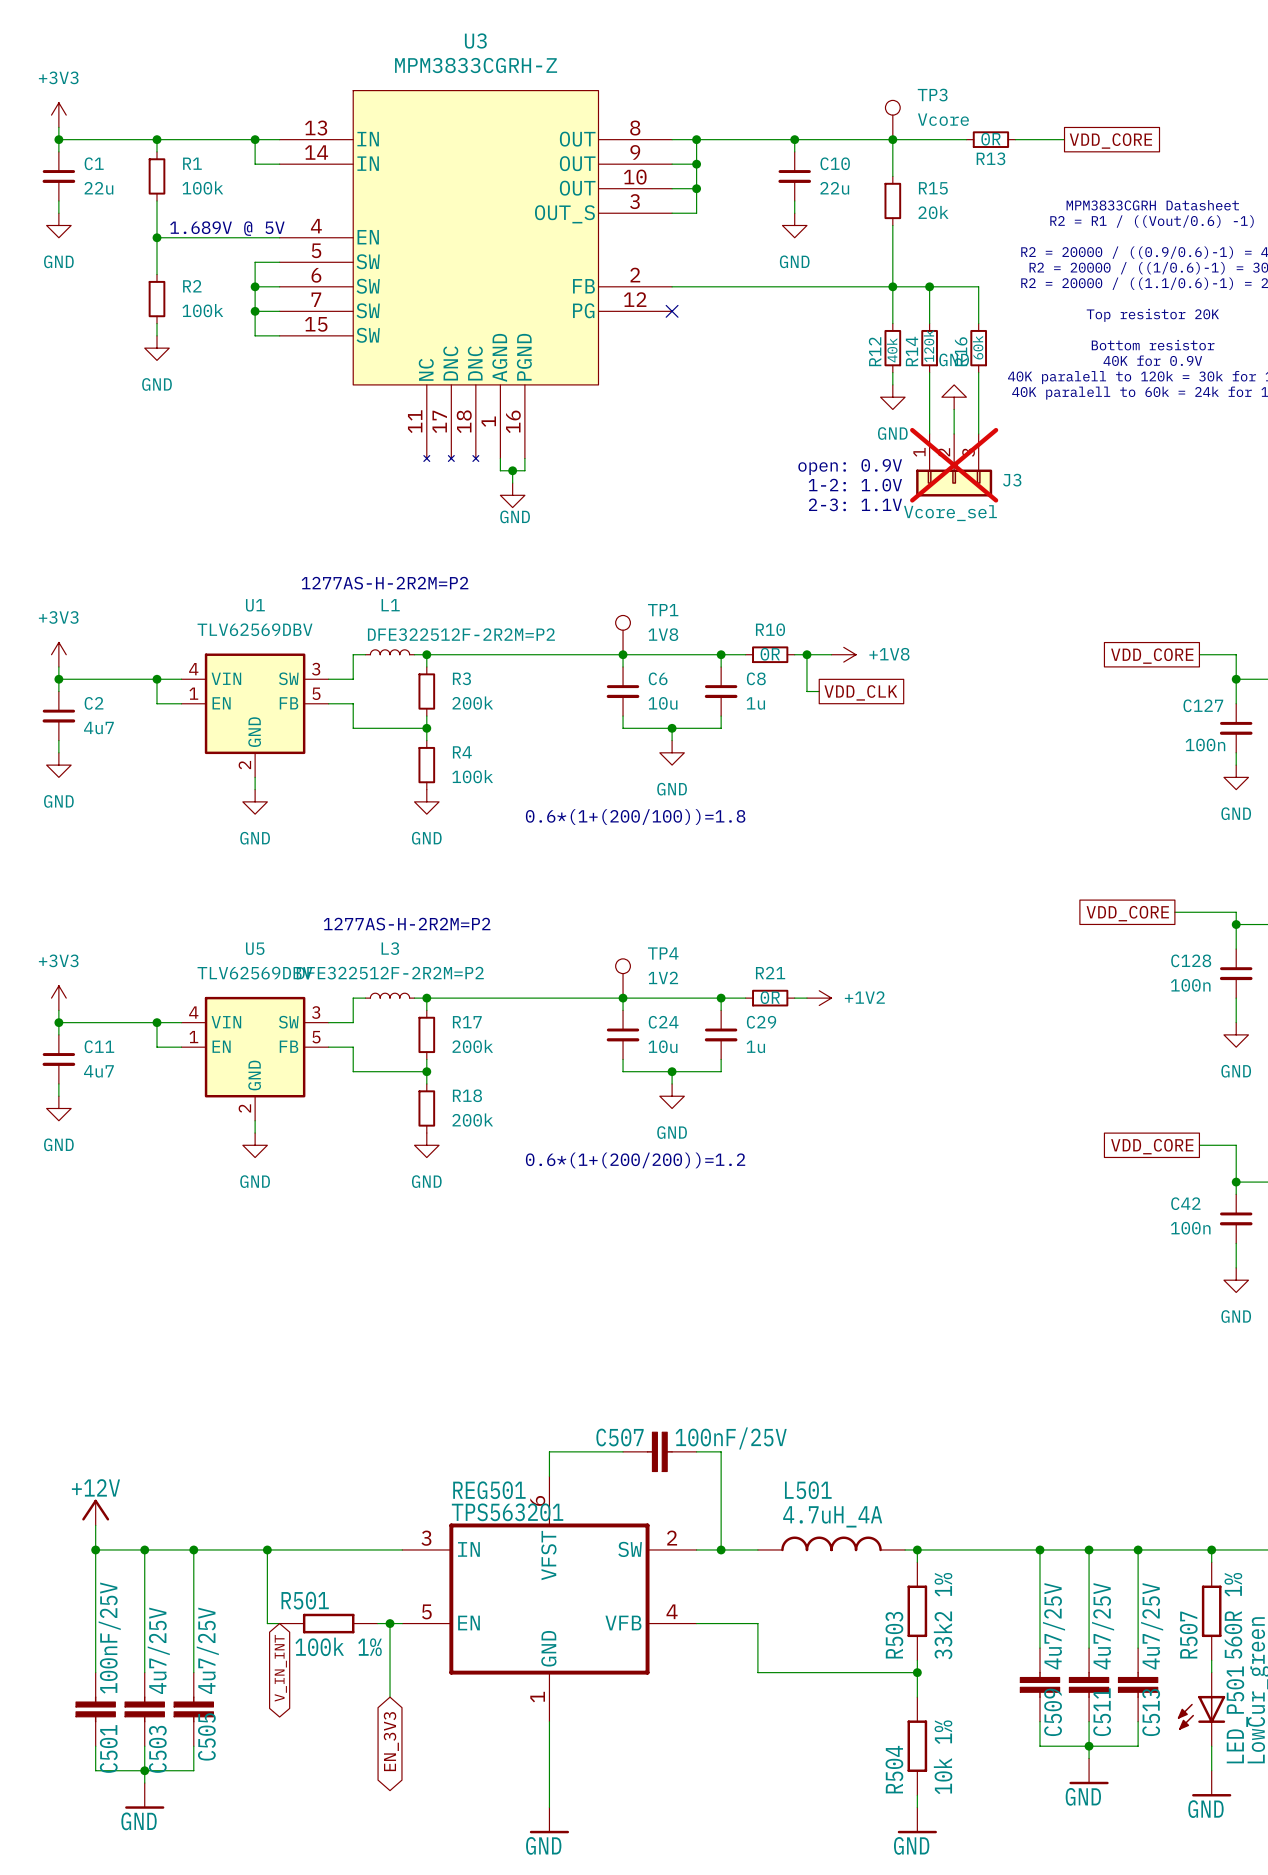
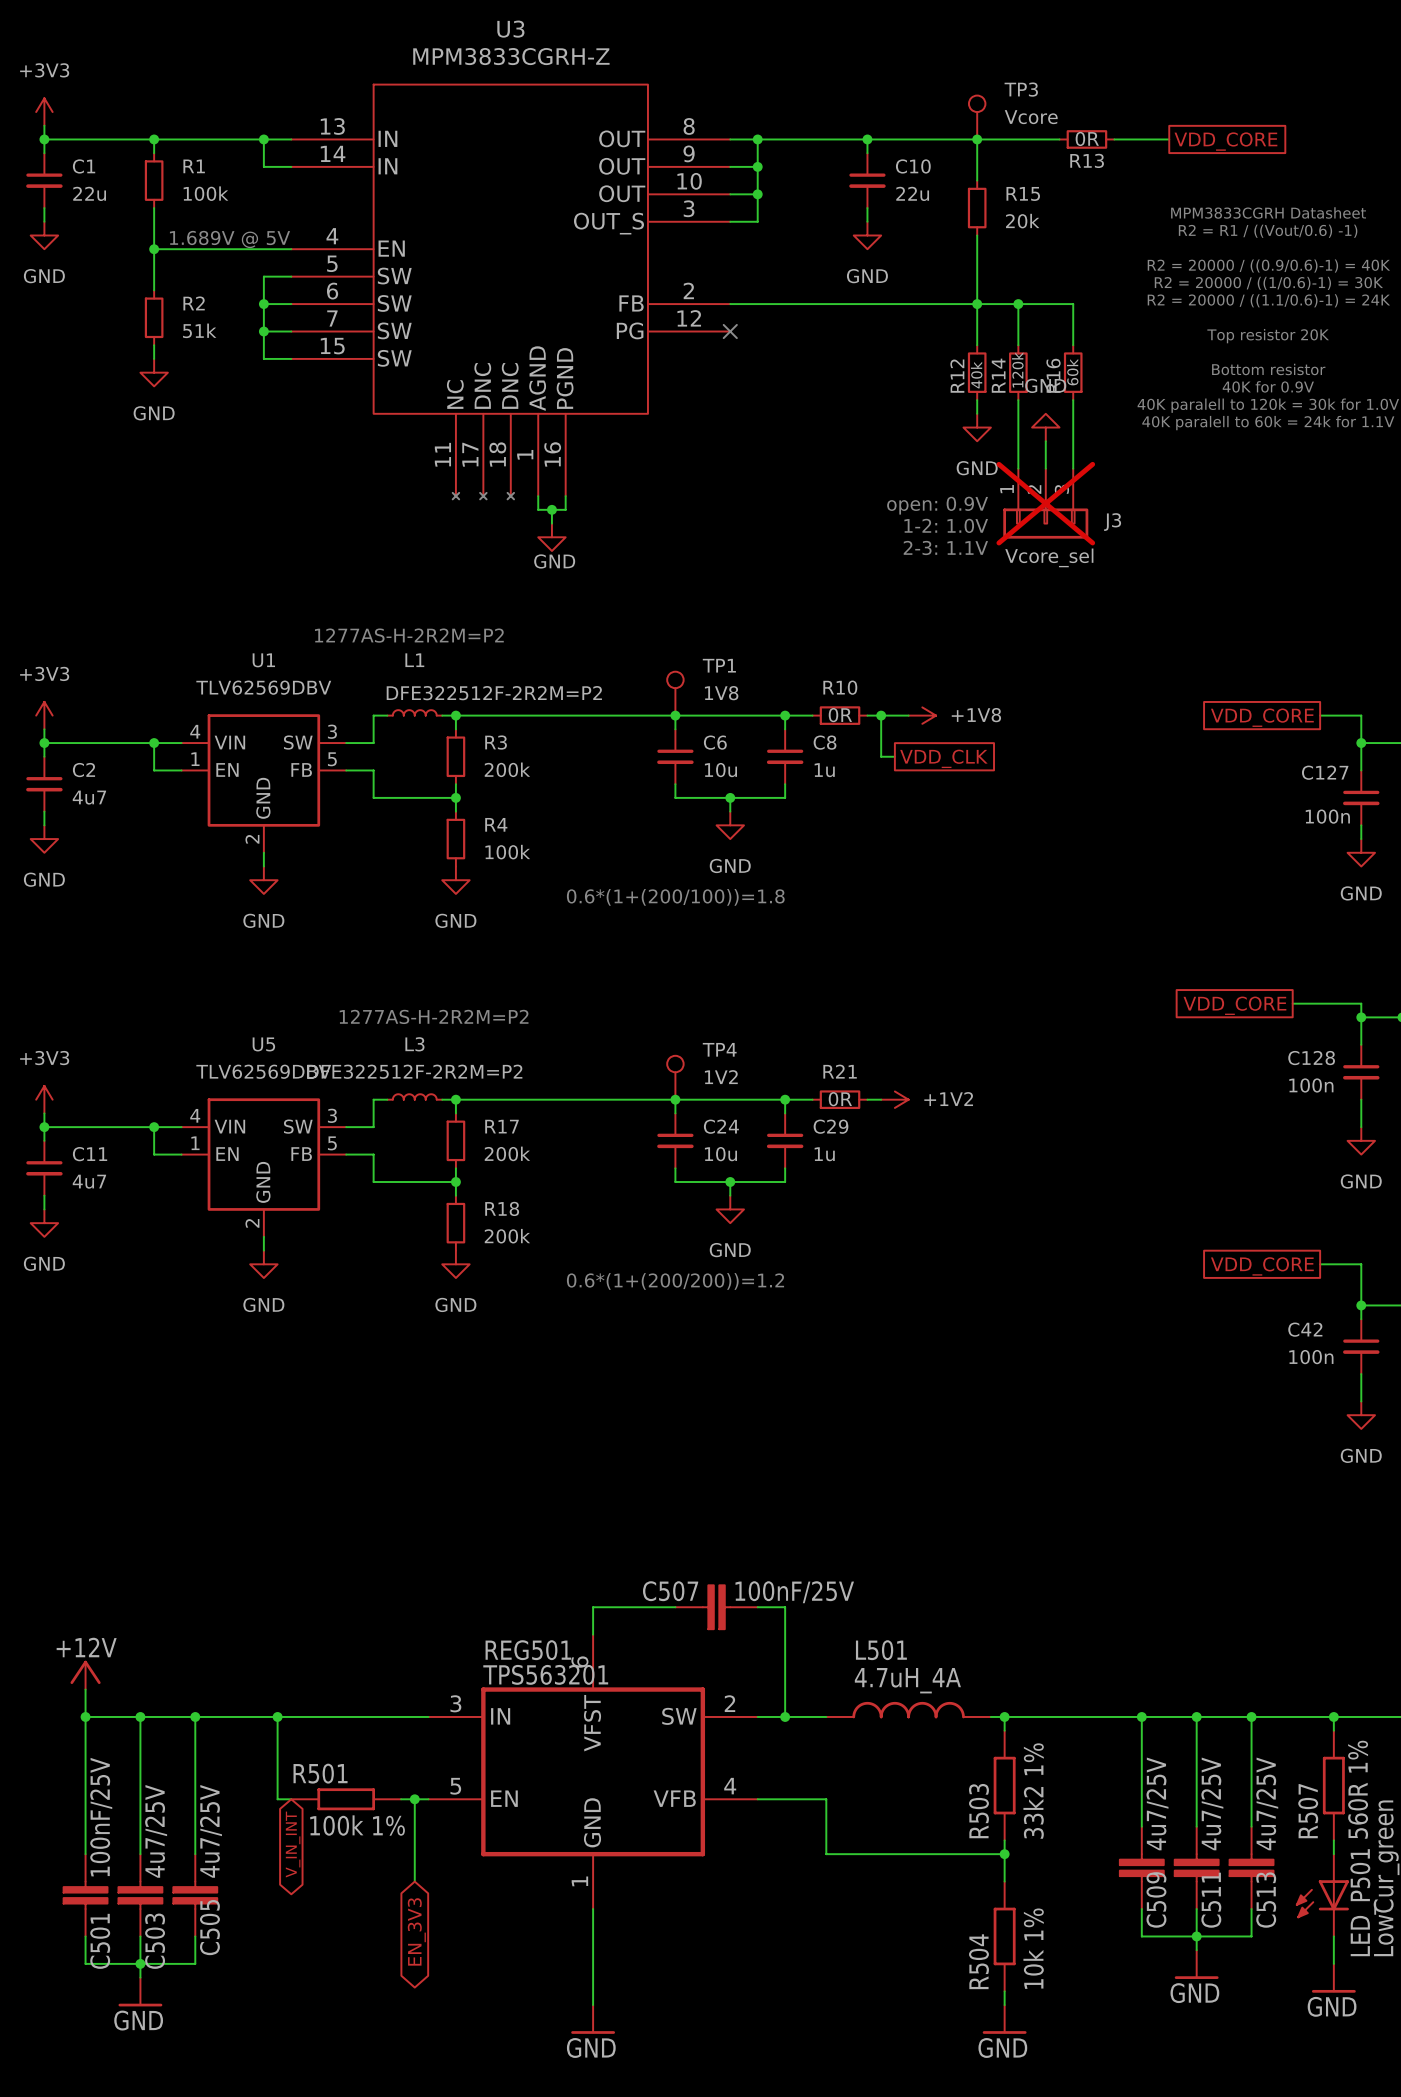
R2 value: 100k (202, 310) -> 51k (199, 330)

